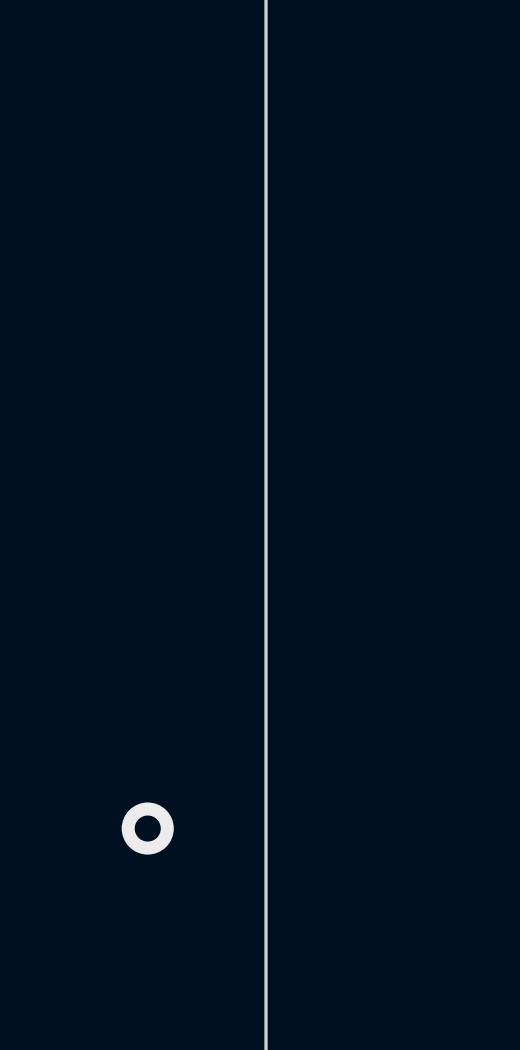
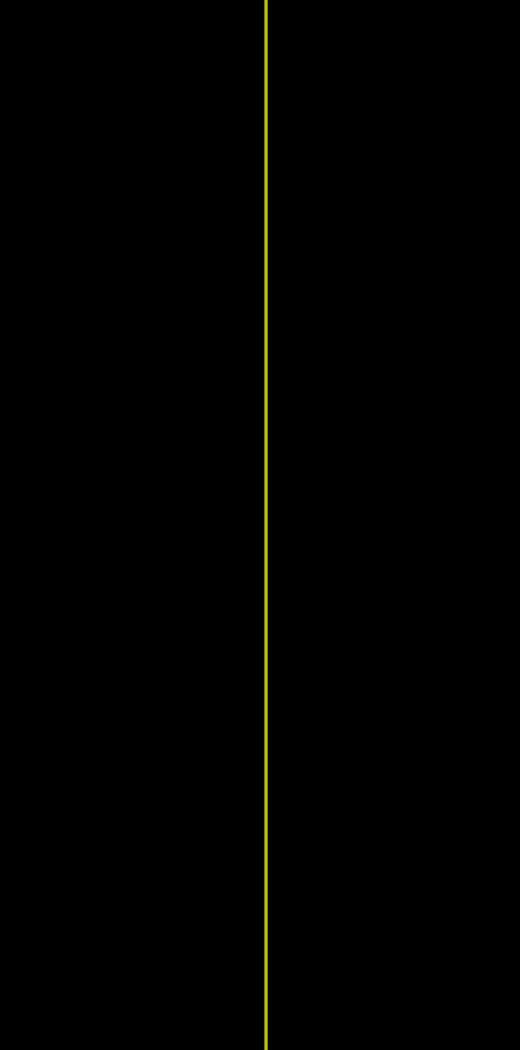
via: (147, 828) -> none

